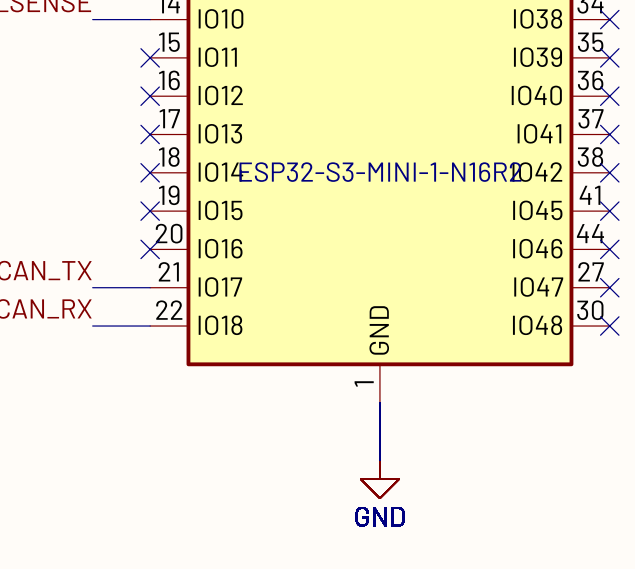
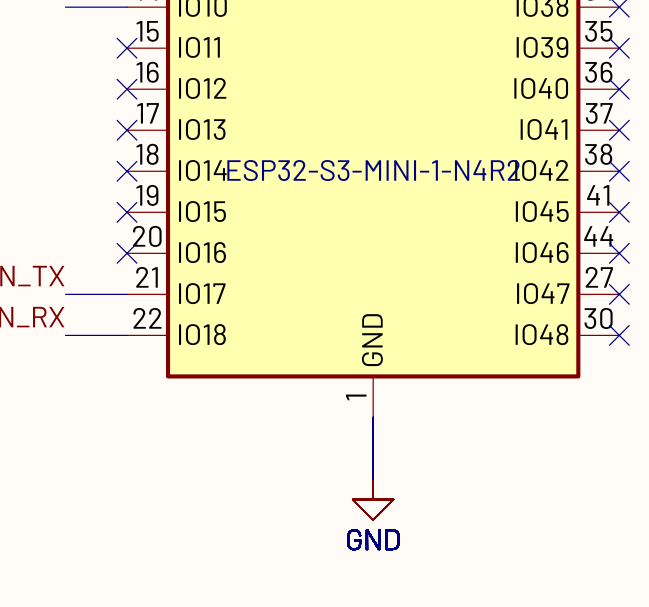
part value: ESP32-S3-MINI-1-N16R2 (380, 172) -> ESP32-S3-MINI-1-N4R2 (373, 170)

